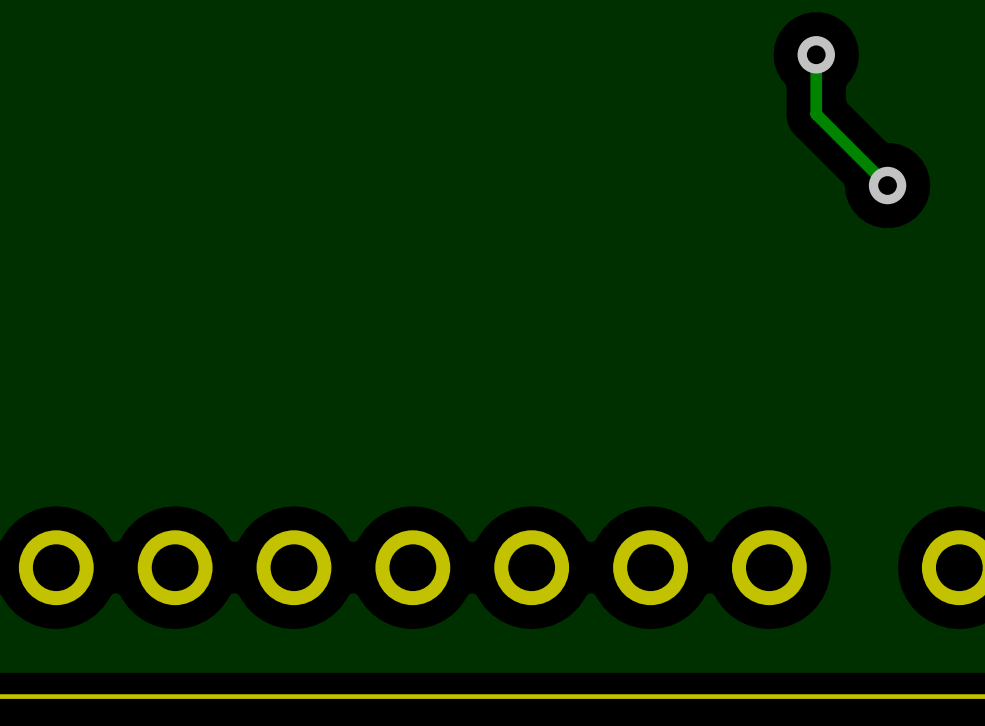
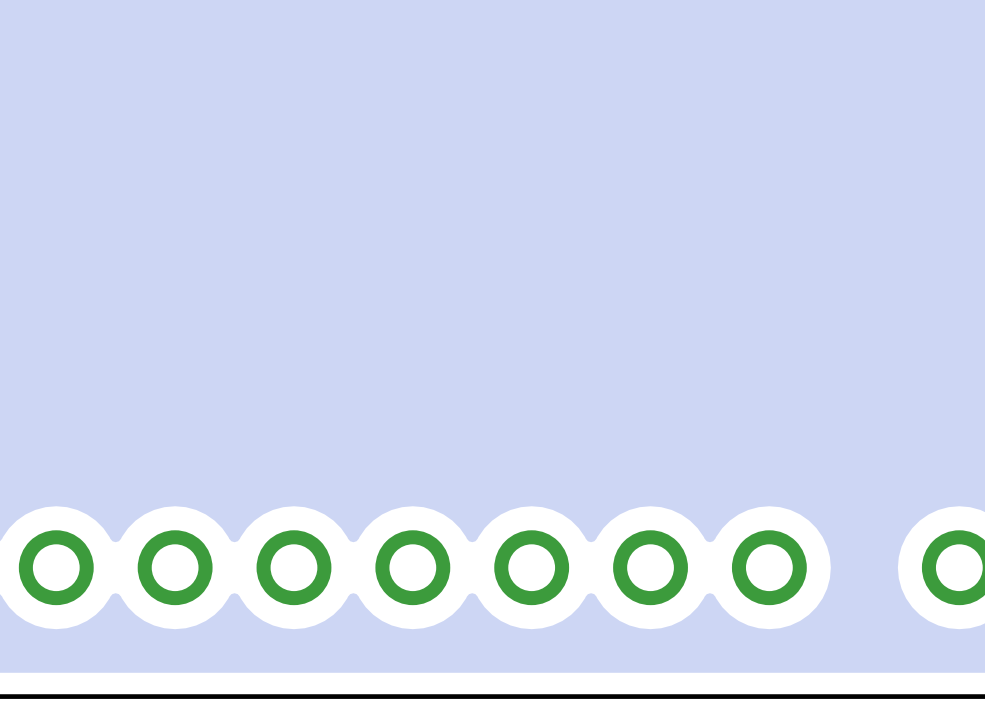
track: (816, 54) (816, 114) (887, 185) -> none
via: (816, 54) -> none
via: (887, 185) -> none

